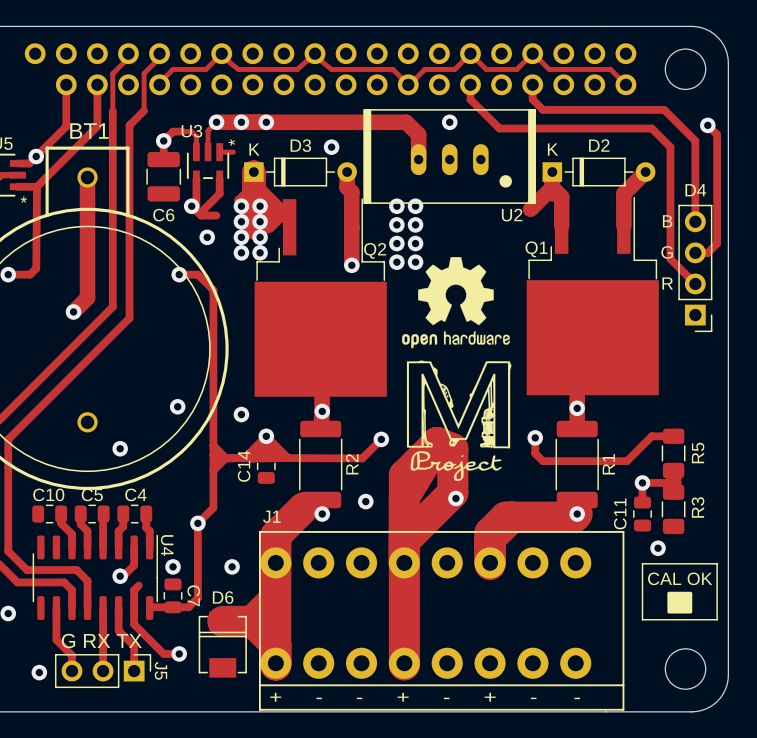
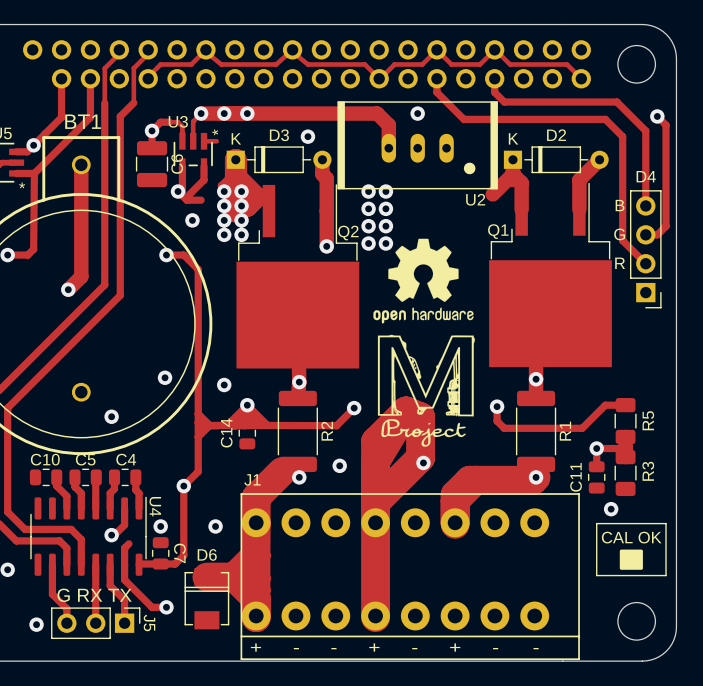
C6 name rotation: 0° (163, 215) -> 90° counterclockwise (177, 164)
C6 name position: C6 (163, 215) -> C6 (177, 164)

